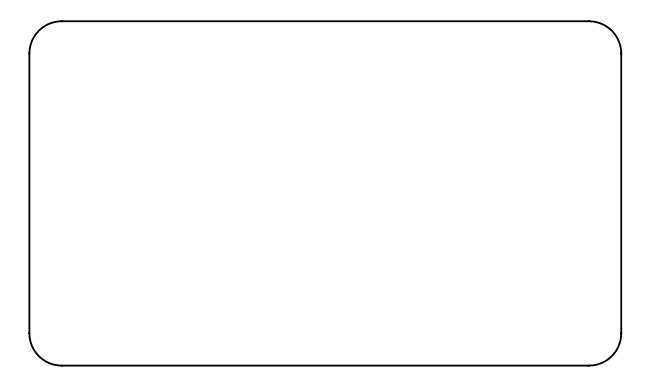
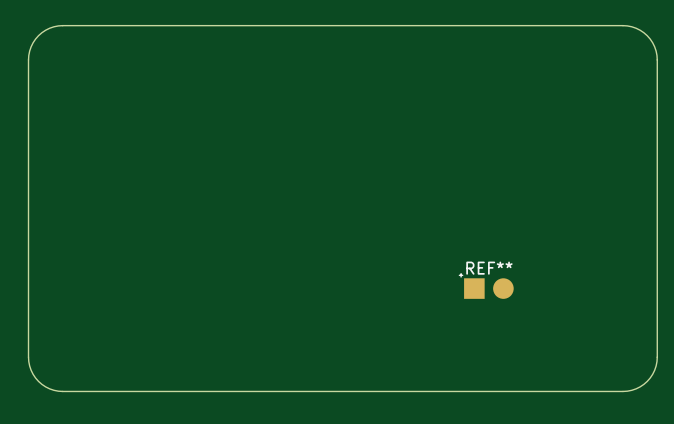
REF**: none -> (486, 285)

